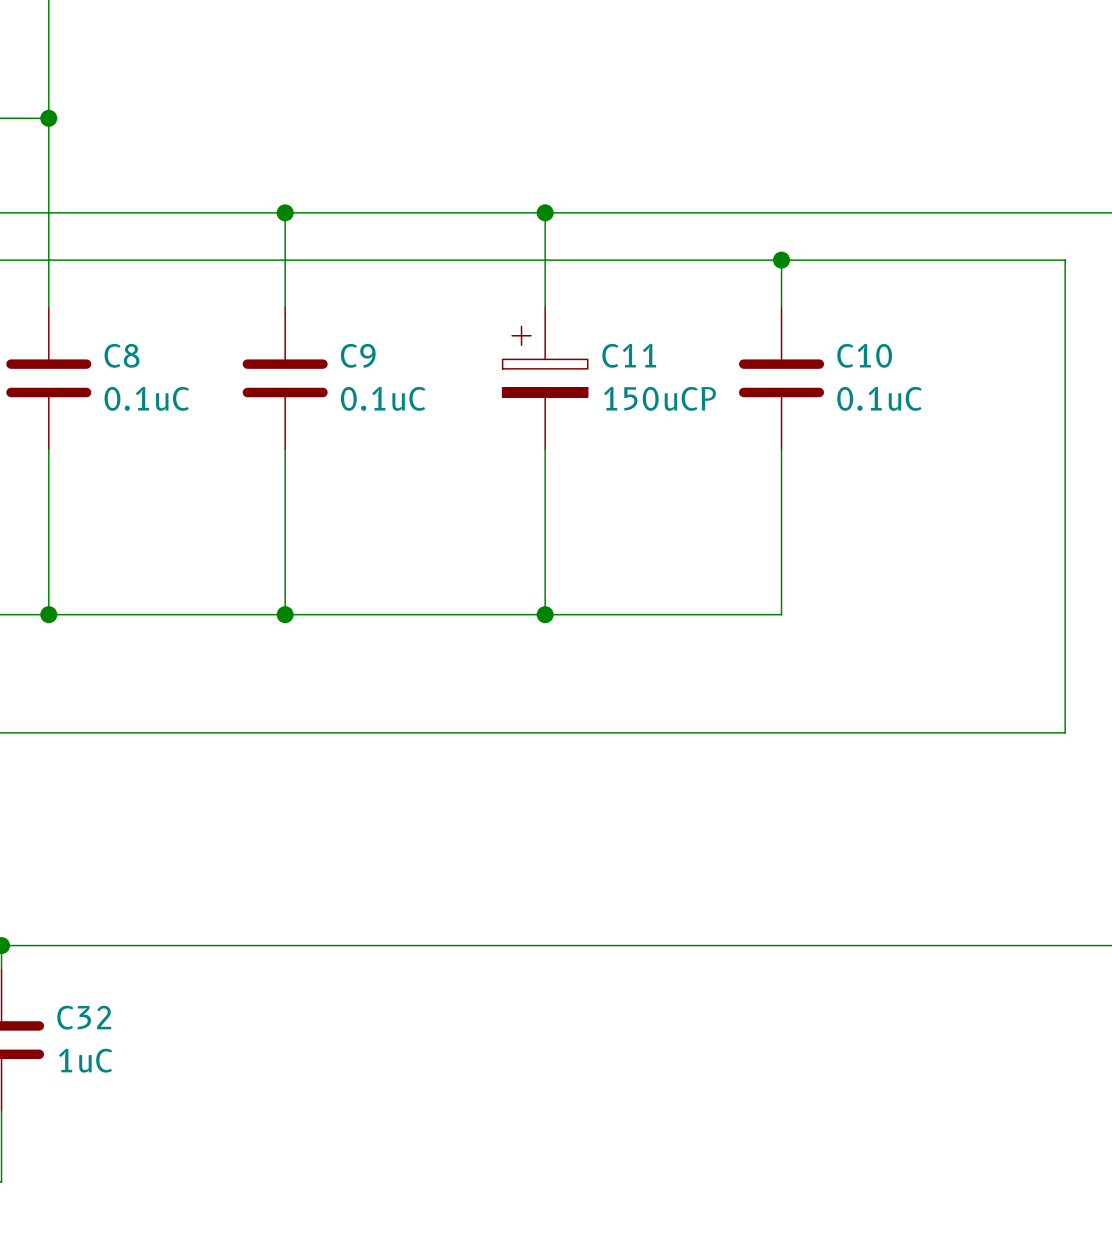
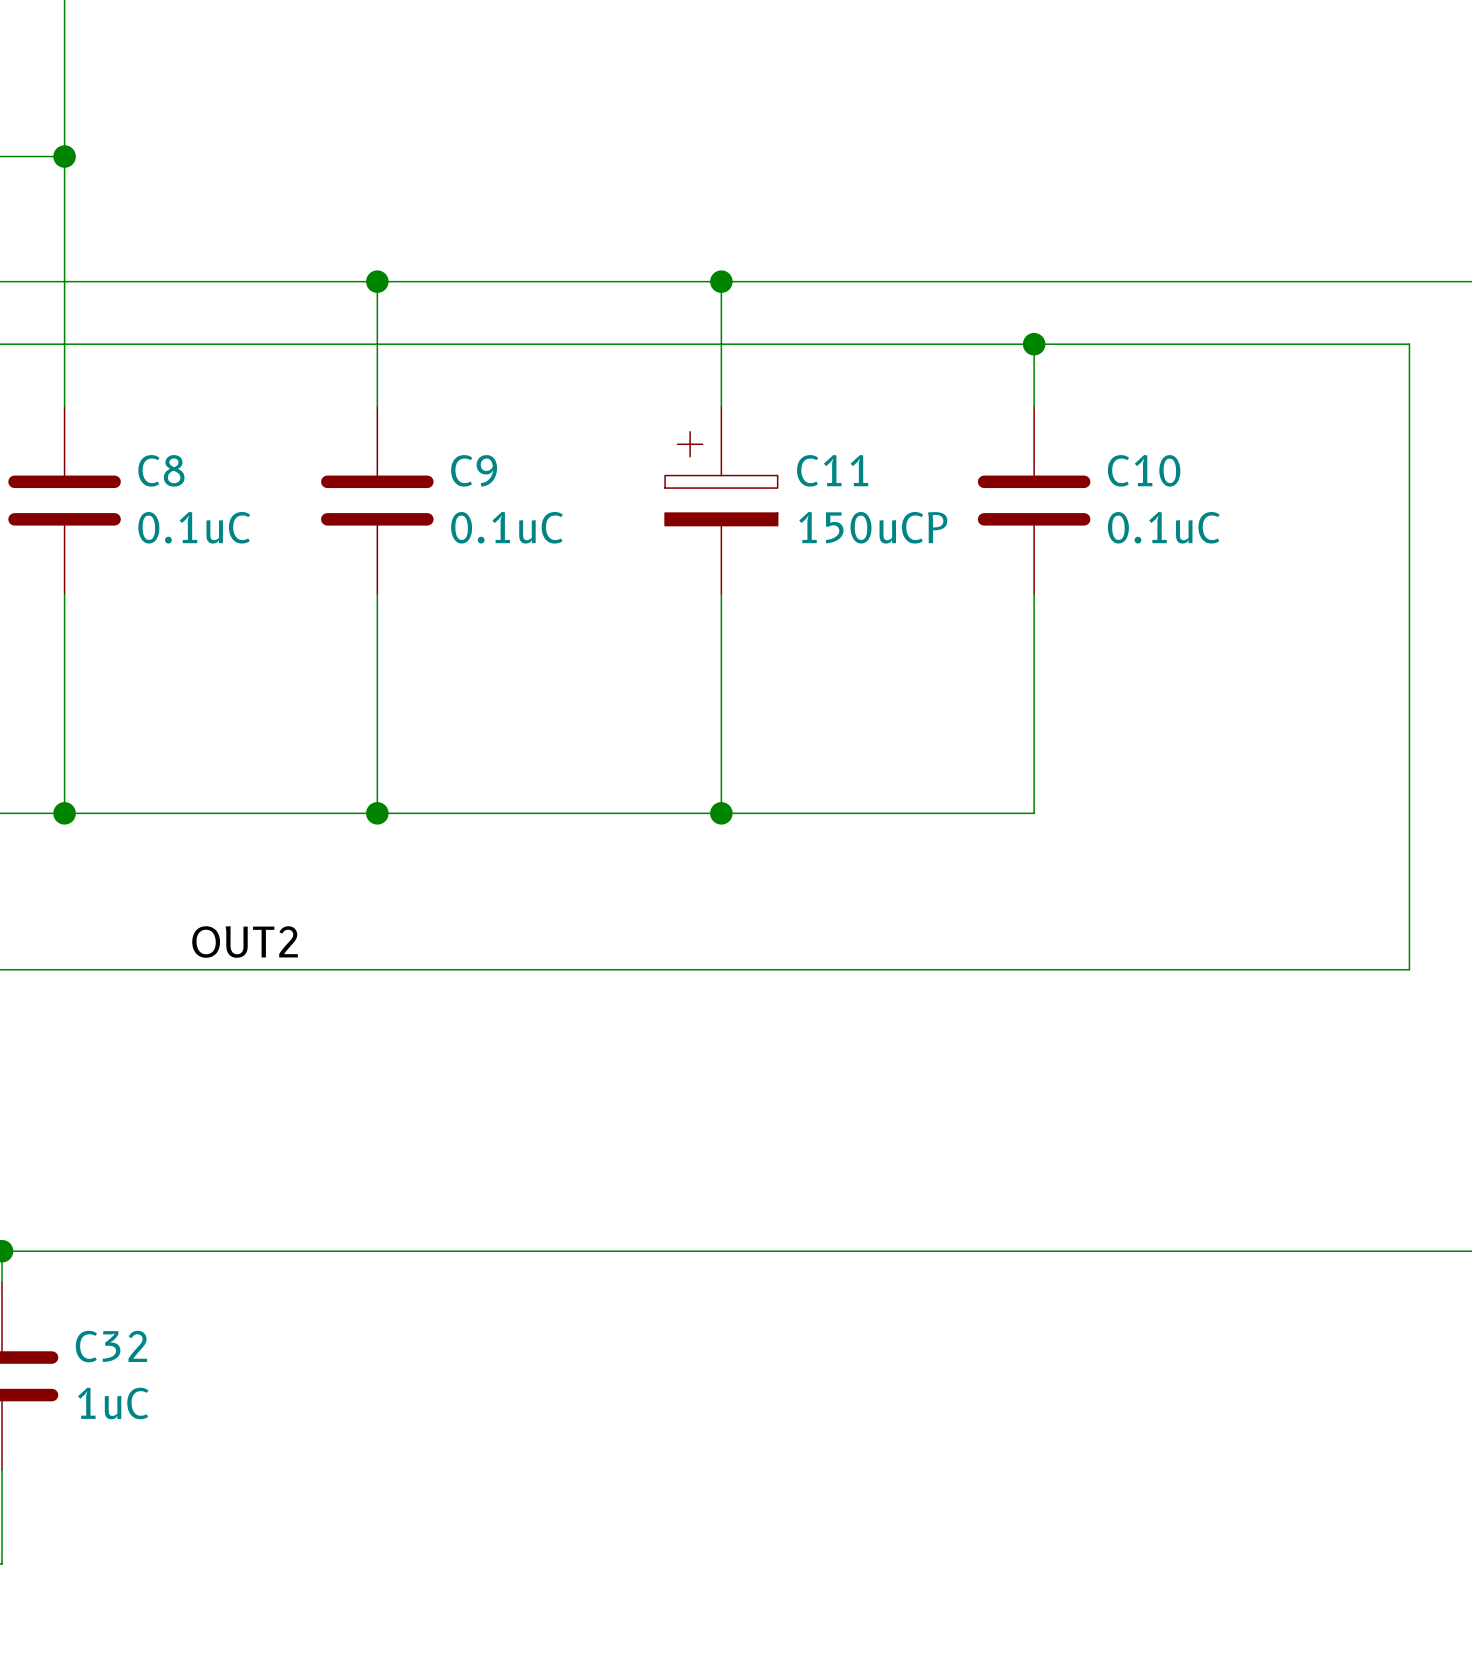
label: none -> OUT2 (245, 941)

